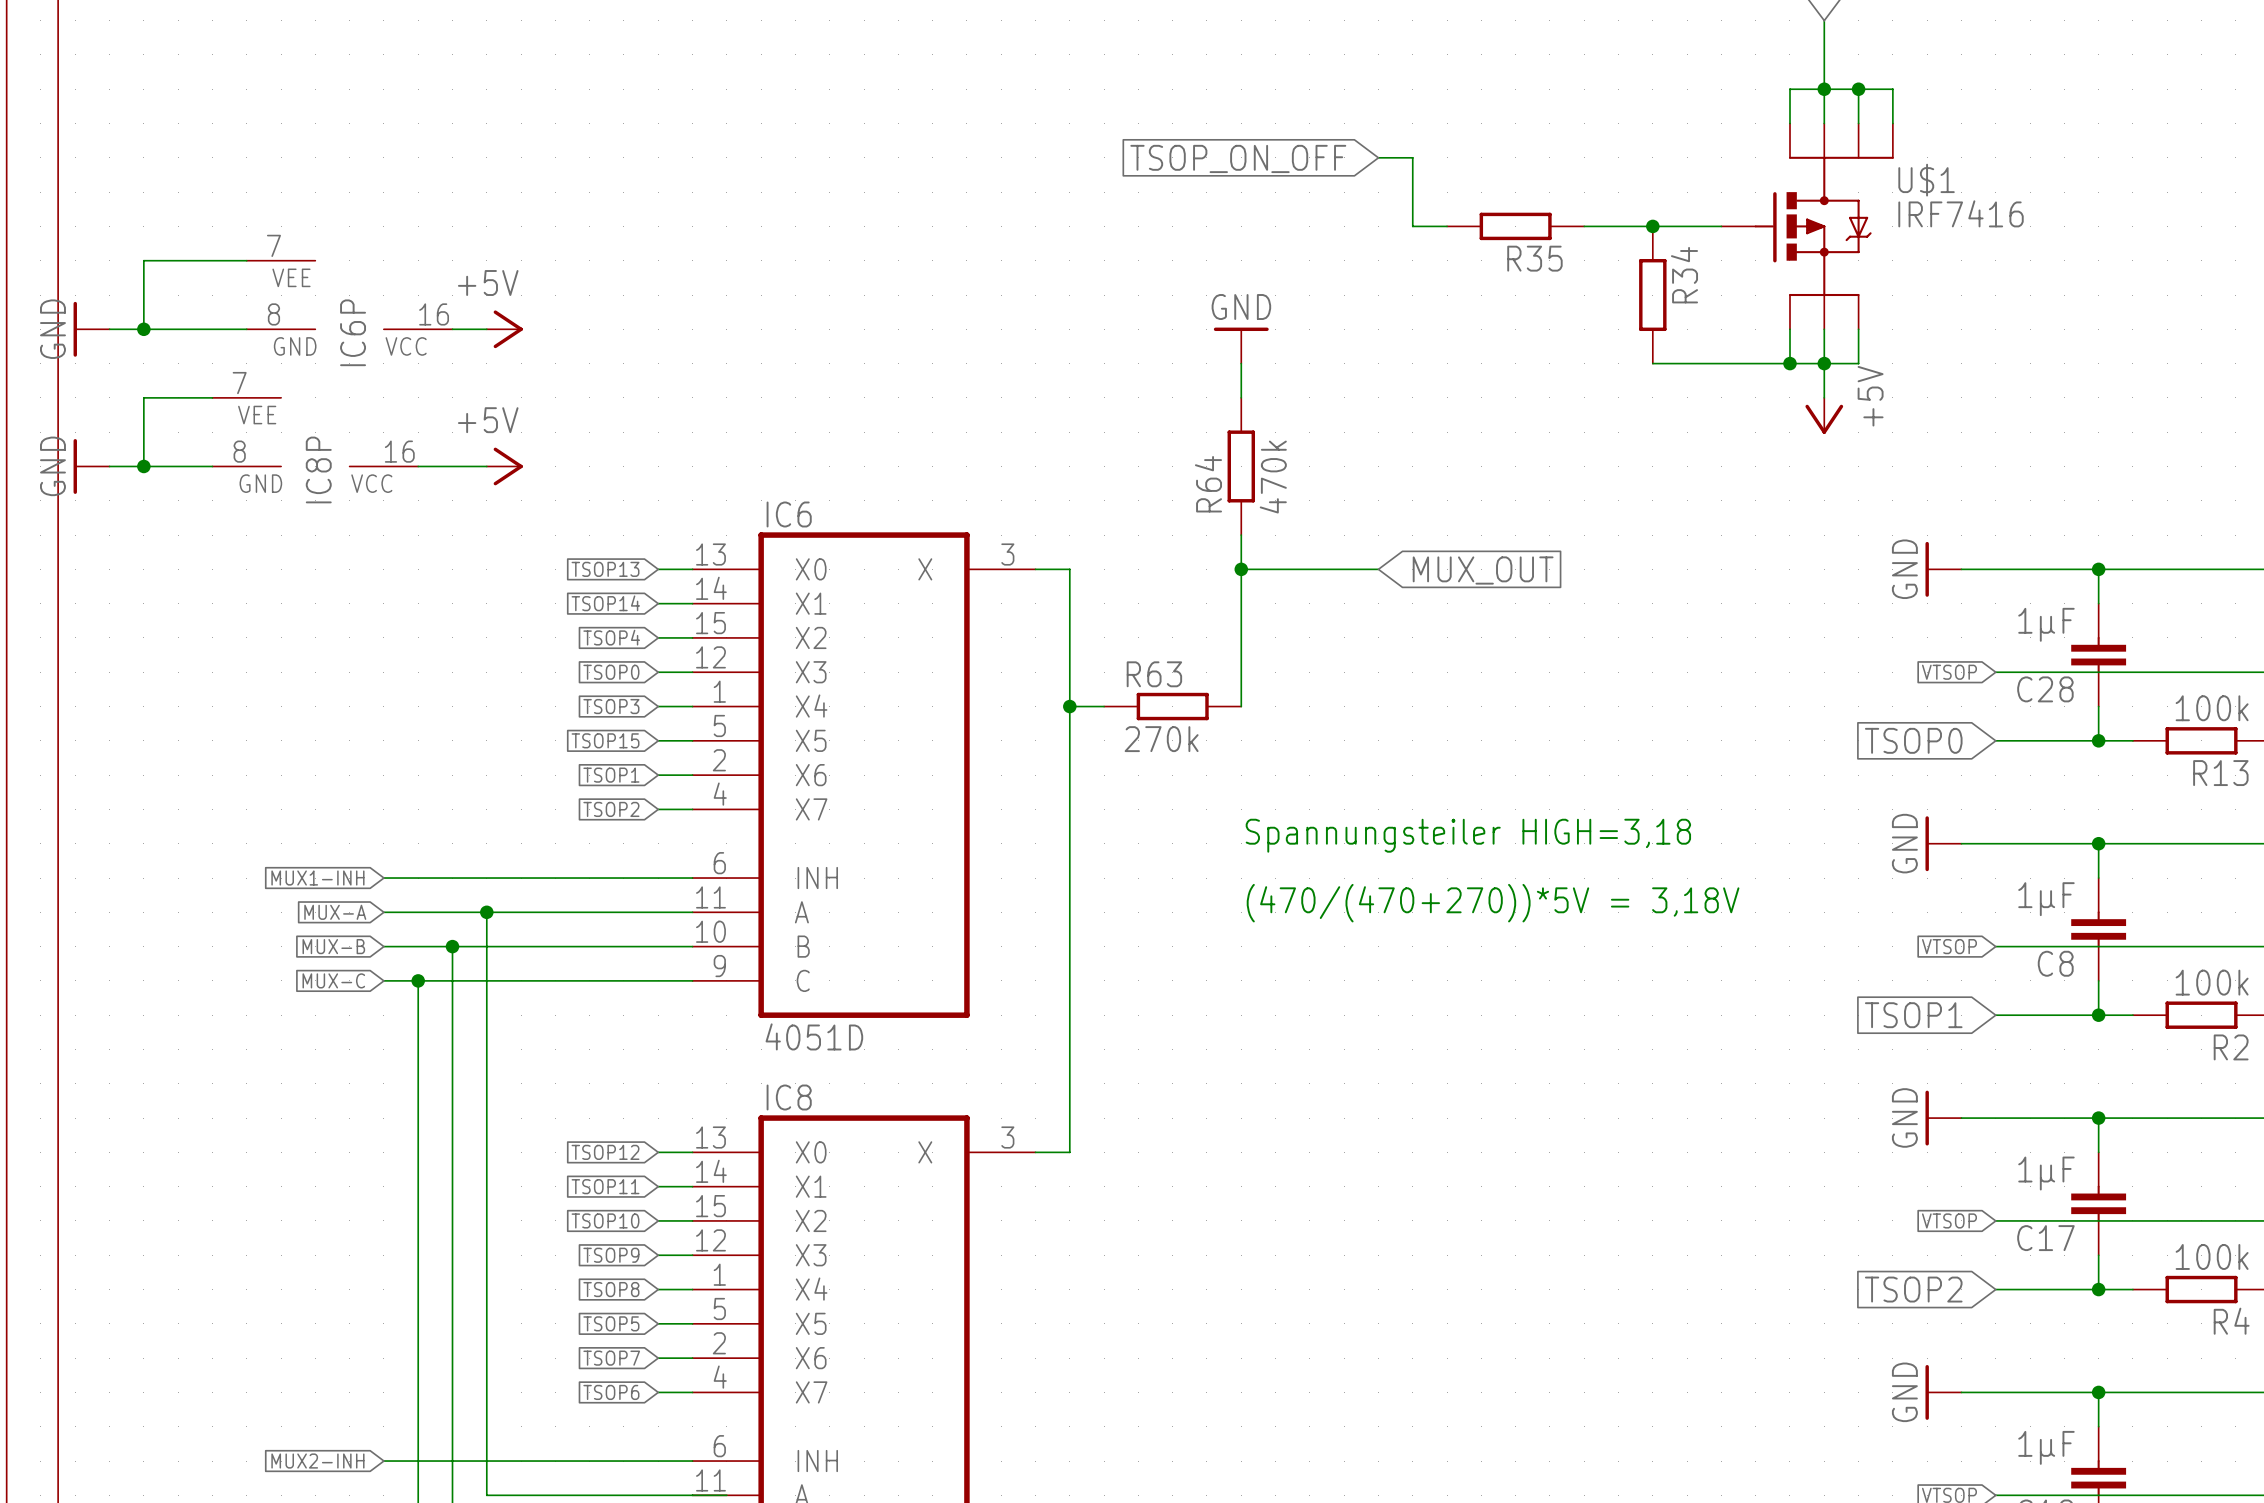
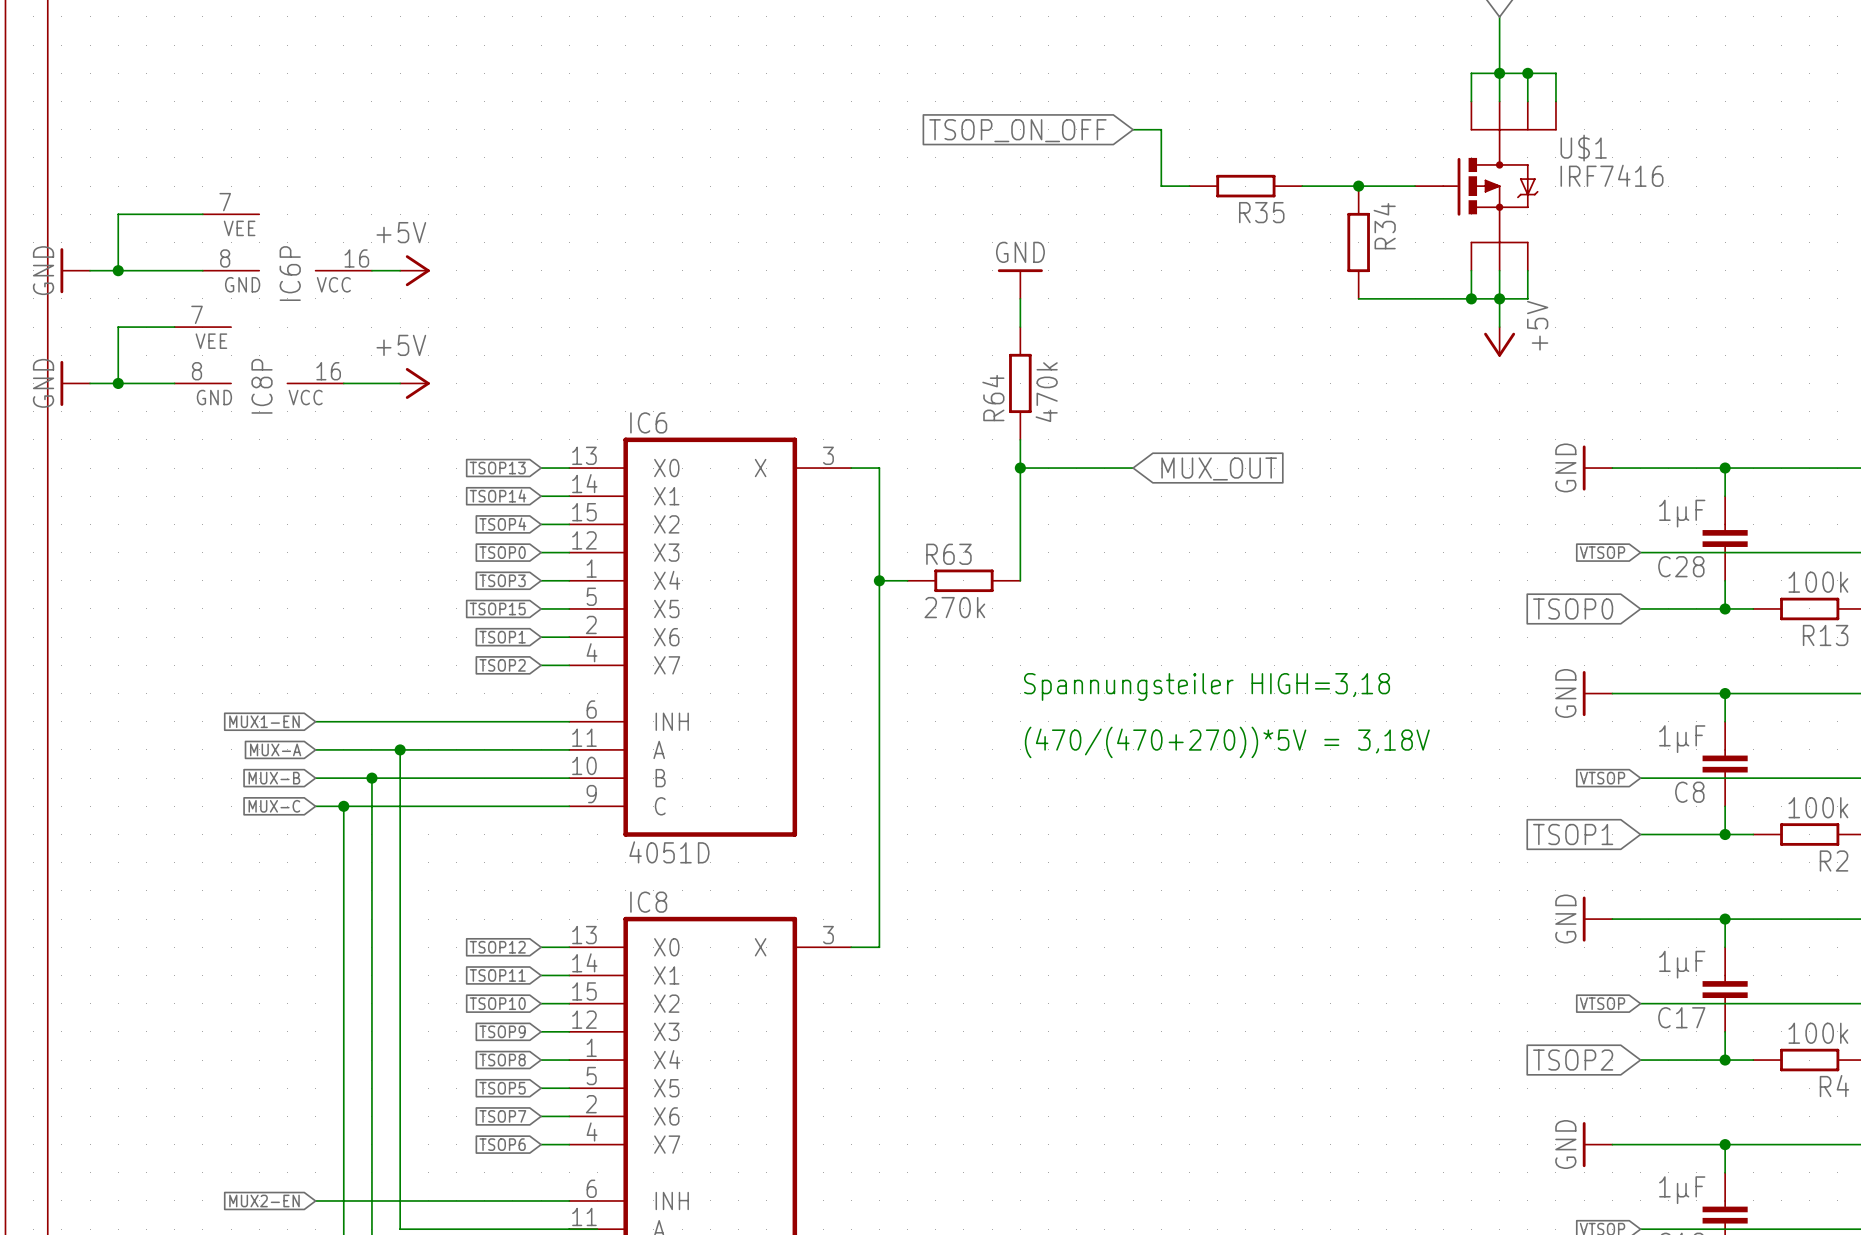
global label: MUX1-INH (317, 878) -> MUX1-EN (264, 721)
global label: MUX2-INH (317, 1461) -> MUX2-EN (264, 1200)

